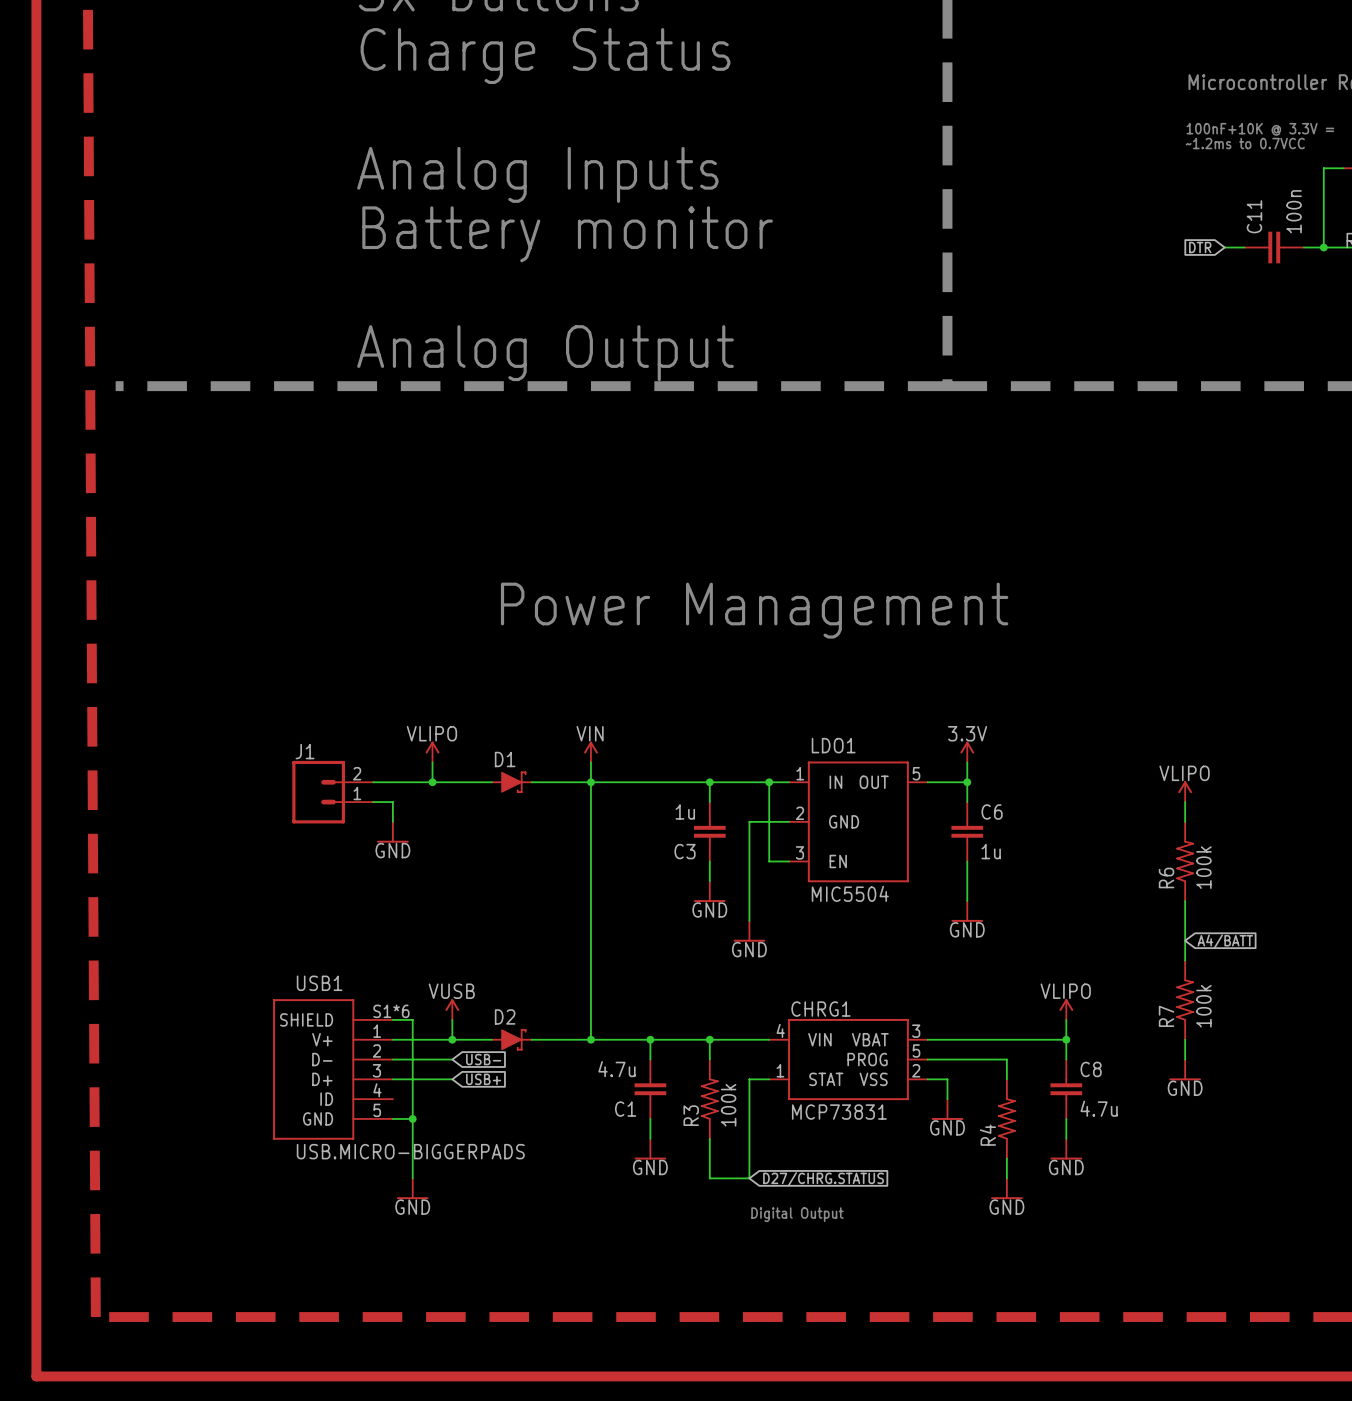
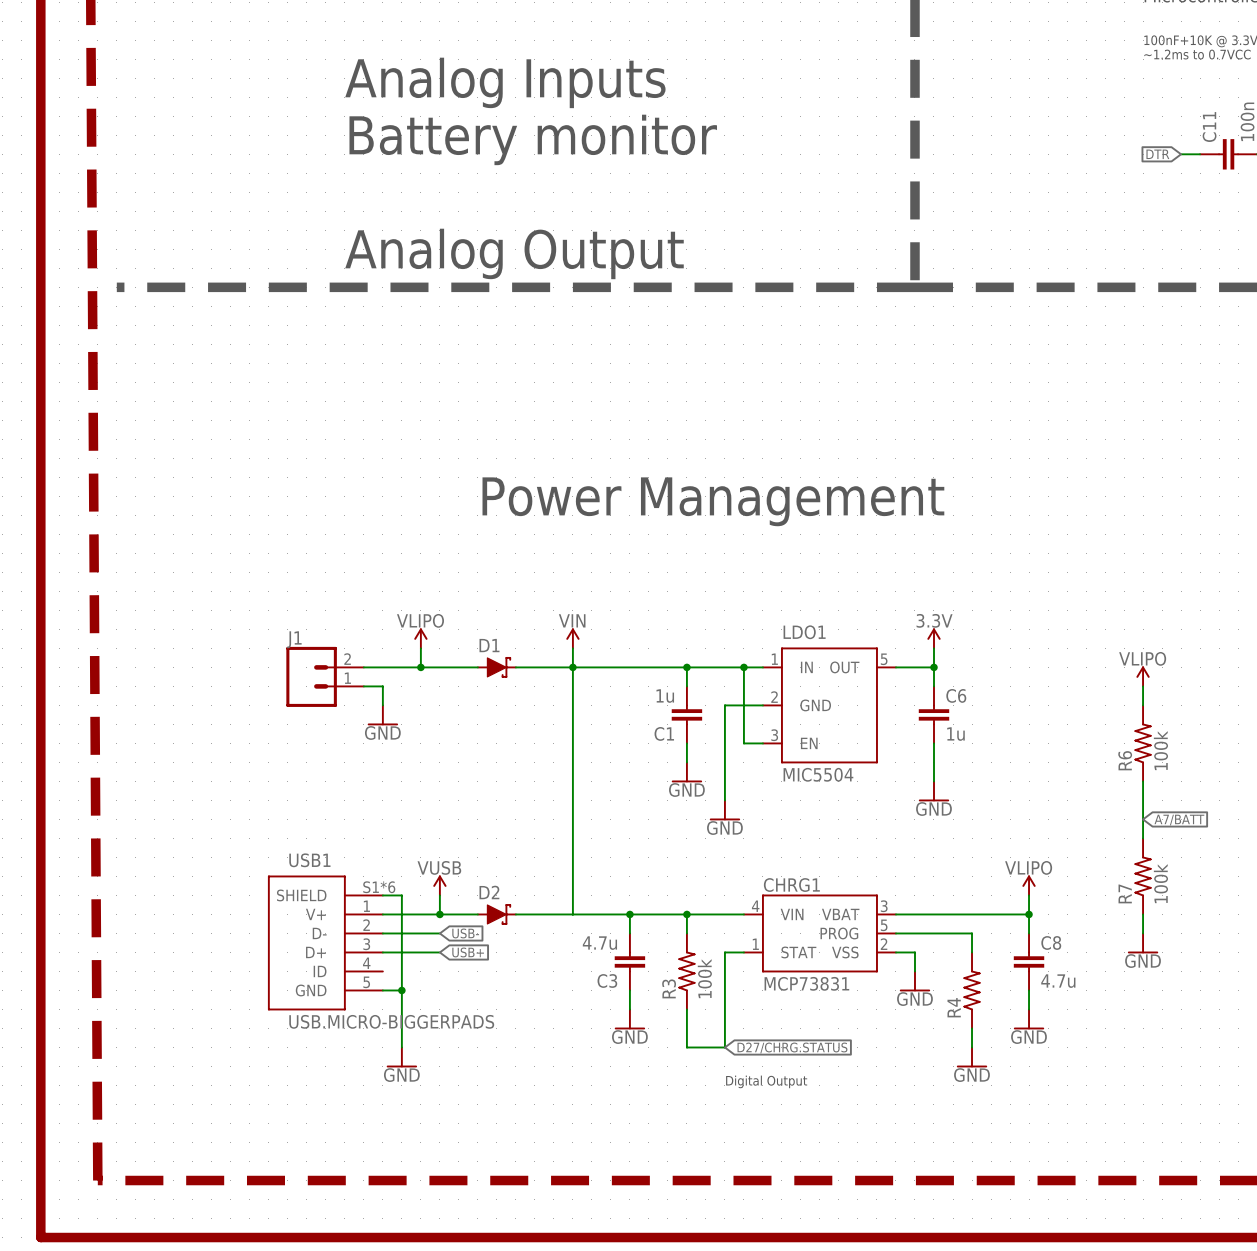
C3 name: C3 (685, 851) -> C1 (664, 733)
global label: A4/BATT (1225, 941) -> A7/BATT (1179, 820)
junction: (590, 1039) -> none
C1 name: C1 (625, 1109) -> C3 (607, 980)

